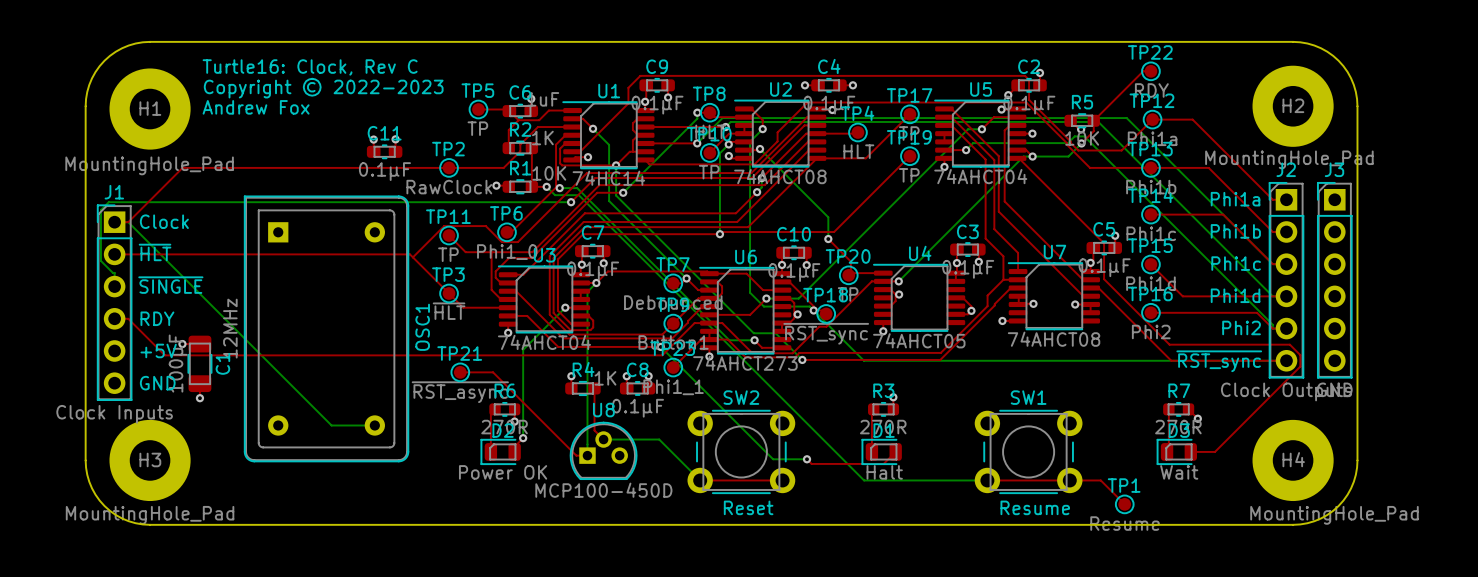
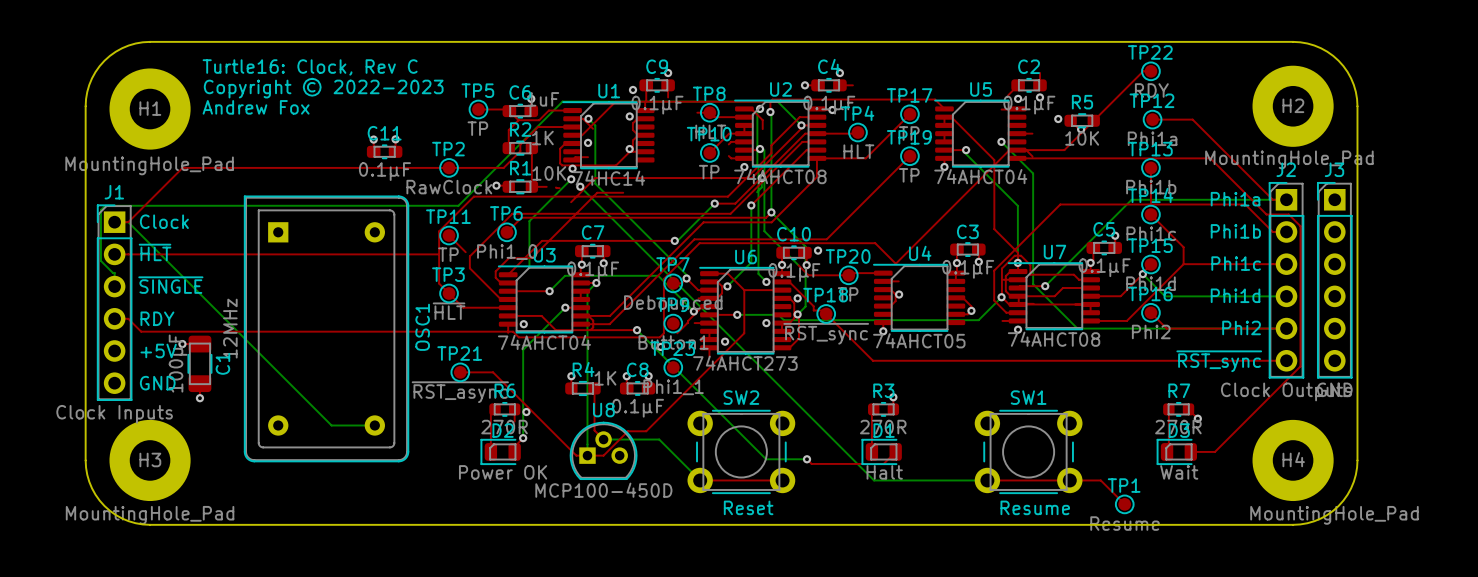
via: (1039, 72) -> none
via: none -> (668, 73)
via position: (852, 85) -> (839, 73)
via: none -> (633, 89)
via: (1008, 95) -> none
via: (668, 97) -> none
via: none -> (1039, 97)
via: none -> (1018, 98)
via: (645, 101) -> none
top track: none -> (770, 101) (770, 112)
top track: none -> (770, 101) (615, 101) (582, 135) (572, 135)
bottom track: none -> (760, 108) (757, 111) (758, 273) (766, 281)
via: none -> (760, 108)
top track: (944, 108) (951, 108) (998, 156) (998, 211) (1083, 296) (1090, 296) -> (944, 108) (935, 99) (772, 99) (770, 101)
via: (1001, 109) -> none
bottom track: (697, 112) (697, 118) (623, 192) -> none
via: (697, 112) -> none
bottom track: none -> (770, 112) (771, 212) (805, 246) (805, 306) (799, 313)
via: none -> (770, 112)
via: none -> (629, 116)
top track: (807, 117) (751, 173) (586, 173) (517, 242) (501, 242) (485, 226) (444, 226) (412, 257) -> (807, 117) (799, 117) (771, 145) (771, 153) (727, 196) (473, 196) (439, 231) (439, 283)
top track: (1017, 117) (994, 117) (981, 129) -> none
bottom track: none -> (588, 118) (595, 125) (595, 183) (688, 276)
via: none -> (588, 118)
via: none -> (1058, 119)
top track: (1152, 119) (1121, 150) (1078, 150) (1029, 99) (1029, 79) (1025, 75) (640, 75) (628, 87) (628, 103) (580, 151) (572, 151) -> none
top track: (1093, 120) (1093, 131) (1081, 143) -> (1093, 120) (1064, 150) (1026, 150)
via: none -> (801, 125)
top track: (944, 125) (951, 125) (985, 159) (985, 238) (1003, 256) (1003, 279) (987, 295) (987, 306) (940, 352) (799, 352) (794, 357) (745, 357) (727, 339) (701, 339) (673, 367) -> (944, 125) (944, 117)
top track: (1017, 125) (1009, 125) (1004, 130) (1004, 201) (1082, 279) -> (1090, 304) (1009, 304) (1001, 297) (1001, 268) (1014, 255) (1021, 255) (1030, 265) (1030, 274) (1073, 274) (1079, 279) (1082, 279)
top track: (645, 127) (725, 127) -> none
bottom track: (725, 127) (730, 121) (1098, 121) (1272, 296) -> (1142, 274) (1165, 296) (1272, 296)
via: (725, 127) -> none
bottom track: (593, 128) (609, 144) (609, 200) (686, 278) -> none
via: (593, 128) -> none
bottom track: (762, 129) (750, 141) (750, 292) (763, 306) (809, 306) (864, 360) (1286, 360) -> none
via: (762, 129) -> none
bottom track: (981, 129) (968, 129) (798, 298) (766, 298) -> none
via: (981, 129) -> none
top track: (806, 133) (761, 178) -> (806, 133) (735, 203) (714, 203)
via: (1032, 133) -> none
top track: (572, 135) (565, 135) (556, 144) (556, 187) (511, 232) (506, 232) -> (771, 212) (766, 217) (521, 217) (506, 232)
top track: (807, 141) (764, 185) (599, 185) (532, 252) (465, 252) -> (807, 141) (802, 141) (730, 213) (512, 213) (469, 256) (469, 268) (501, 299)
via: none -> (1001, 141)
via: none -> (588, 142)
top track: (645, 143) (697, 143) -> none
bottom track: (697, 143) (722, 118) (1126, 118) (1272, 264) (1286, 264) -> none
via: (697, 143) -> none
bottom track: (1081, 143) (1068, 156) (1023, 156) (898, 281) -> none
via: (1081, 143) -> none
bottom track: (728, 144) (719, 153) (719, 234) -> none
via: (728, 144) -> none
via: none -> (629, 149)
bottom track: (760, 149) (828, 217) (828, 239) -> none
bottom track: none -> (764, 150) (764, 231) (798, 265)
top track: (809, 150) (737, 222) (583, 222) (549, 255) (549, 314) (569, 334) (662, 334) (698, 298) -> (809, 150) (806, 150) (751, 205)
bottom track: none -> (962, 150) (1017, 205) (1017, 262)
bottom track: (966, 150) (973, 143) (1068, 143) (1074, 136) (1084, 136) (1272, 324) (1272, 328) -> (1001, 141) (1033, 173) (1033, 284) (1077, 328) (1272, 328)
via: (728, 156) -> none
via: (1032, 156) -> none
via: (588, 157) -> none
top track: (816, 158) (748, 227) (584, 227) (553, 258) (553, 313) (570, 330) -> (816, 158) (816, 177) (771, 222) (703, 222) (609, 315) (588, 315)
top track: (1019, 158) (1104, 243) (1104, 279) (1169, 344) (1289, 344) (1300, 355) (1300, 366) -> (1019, 158) (1210, 158) (1266, 214) (1288, 214) (1300, 226) (1300, 366)
top track: (645, 159) (649, 164) (754, 164) (777, 141) (777, 132) (807, 102) (1026, 102) (1090, 167) (1208, 167) (1245, 204) -> (1018, 312) (1006, 312) (994, 300) (994, 270) (1060, 204) (1245, 204)
bottom track: (616, 165) (616, 195) (753, 333) (775, 333) (802, 359) -> none
via: (616, 165) -> none
via: none -> (744, 167)
top track: none -> (1150, 167) (1150, 204)
via: none -> (572, 168)
bottom track: none -> (571, 179) (529, 221) (529, 267)
via: none -> (571, 179)
bottom track: (546, 186) (555, 195) (578, 195) (864, 480) (874, 480) -> (580, 186) (874, 480)
via: (546, 186) -> none
via: none -> (580, 186)
bottom track: (559, 188) (577, 188) (729, 340) (754, 340) -> none
via: (559, 188) -> none
via: (623, 192) -> none
top track: (757, 192) (735, 213) (584, 213) (523, 274) (508, 274) -> (674, 240) (542, 240) (508, 274)
via: (757, 192) -> none
bottom track: none -> (1286, 199) (1131, 199) (1045, 286)
bottom track: (571, 202) (108, 202) (105, 205) -> (801, 125) (777, 101) (562, 101) (458, 205) (105, 205)
via: (571, 202) -> none
bottom track: none -> (714, 203) (677, 240) (674, 240)
via: none -> (714, 203)
bottom track: none -> (751, 205) (751, 262) (727, 286)
via: none -> (751, 205)
via: none -> (771, 212)
top track: (1150, 214) (1223, 214) (1272, 264) -> (1183, 264) (1272, 264)
top track: none -> (1150, 214) (1183, 247) (1183, 264)
top track: (834, 232) (583, 234) (557, 259) (557, 310) (571, 324) (580, 324) -> (834, 232) (826, 239) (694, 239) (609, 324) (580, 324)
via: (719, 234) -> none
top track: (828, 239) (850, 261) (850, 273) -> none
via position: (828, 239) -> (818, 250)
via: none -> (674, 240)
top track: (491, 252) (491, 289) (501, 299) -> none
top track: (409, 254) (439, 283) -> (409, 254) (439, 254)
via: none -> (1017, 262)
top track: (1150, 264) (1182, 296) (1286, 296) -> (1150, 264) (1120, 296) (1090, 296)
top track: none -> (1183, 264) (1126, 320) (1090, 320)
top track: none -> (798, 265) (808, 275) (848, 275)
top track: none -> (1018, 271) (1010, 271) (1005, 276) (1005, 291) (1010, 296) (1054, 296) (1062, 288) (1090, 288)
top track: (709, 273) (707, 271) (607, 271) (596, 282) -> none
top track: (727, 273) (746, 273) (763, 290) -> (727, 273) (744, 290)
via: none -> (1142, 274)
via: none -> (766, 281)
top track: (883, 281) (871, 281) (826, 326) (819, 326) (792, 353) (752, 353) (722, 323) (709, 323) -> none
via: (898, 281) -> none
via: none -> (727, 286)
via: none -> (1045, 286)
top track: (1018, 288) (1010, 288) (940, 359) (802, 359) -> (1018, 288) (1019, 286) (1045, 286)
top track: (1098, 288) (1171, 360) -> (826, 313) (873, 360) (1171, 360)
top track: none -> (744, 290) (763, 290)
top track: none -> (744, 290) (744, 333) (646, 431) (627, 431) (603, 455) (587, 455)
top track: (516, 291) (563, 338) (672, 338) (677, 333) -> (516, 291) (549, 291)
bottom track: none -> (549, 291) (565, 275) (658, 275) (693, 311)
via: none -> (549, 291)
bottom track: none -> (1001, 297) (978, 320) (783, 320) (778, 314) (737, 314)
via: none -> (1001, 297)
top track: (766, 298) (750, 314) (737, 314) -> none
via: (766, 298) -> none
via: none -> (797, 298)
via: (1033, 303) -> none
via: (1075, 304) -> none
via: (813, 310) -> none
via: none -> (693, 311)
top track: (1150, 312) (1257, 312) (1272, 328) -> (1150, 312) (1166, 328) (1272, 328)
via: none -> (737, 314)
top track: (527, 315) (558, 346) (660, 346) -> (527, 315) (541, 315) (555, 330) (570, 330)
via: (1002, 320) -> none
top track: (694, 323) (662, 355) (164, 355) (141, 331) -> (1017, 150) (1009, 150) (895, 263) (875, 243) (699, 243) (663, 278) (663, 333) (659, 337) (518, 337) (513, 331) (141, 331)
via: none -> (766, 323)
via: none -> (1018, 329)
via: none -> (637, 330)
via position: (508, 332) -> (523, 324)
top track: (754, 340) (762, 347) (782, 347) -> (799, 313) (799, 338) (789, 347) (782, 347)
via: (754, 340) -> none
via: none -> (725, 341)
bottom track: (660, 346) (773, 459) -> (637, 330) (766, 459) (773, 459)
via: (709, 356) -> none
via: (802, 359) -> none
via position: (514, 421) -> (526, 412)

